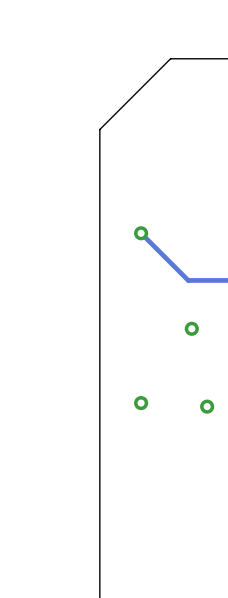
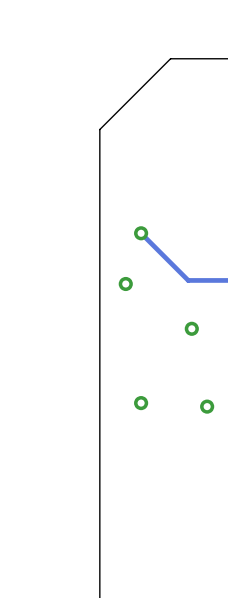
via: none -> (125, 283)

